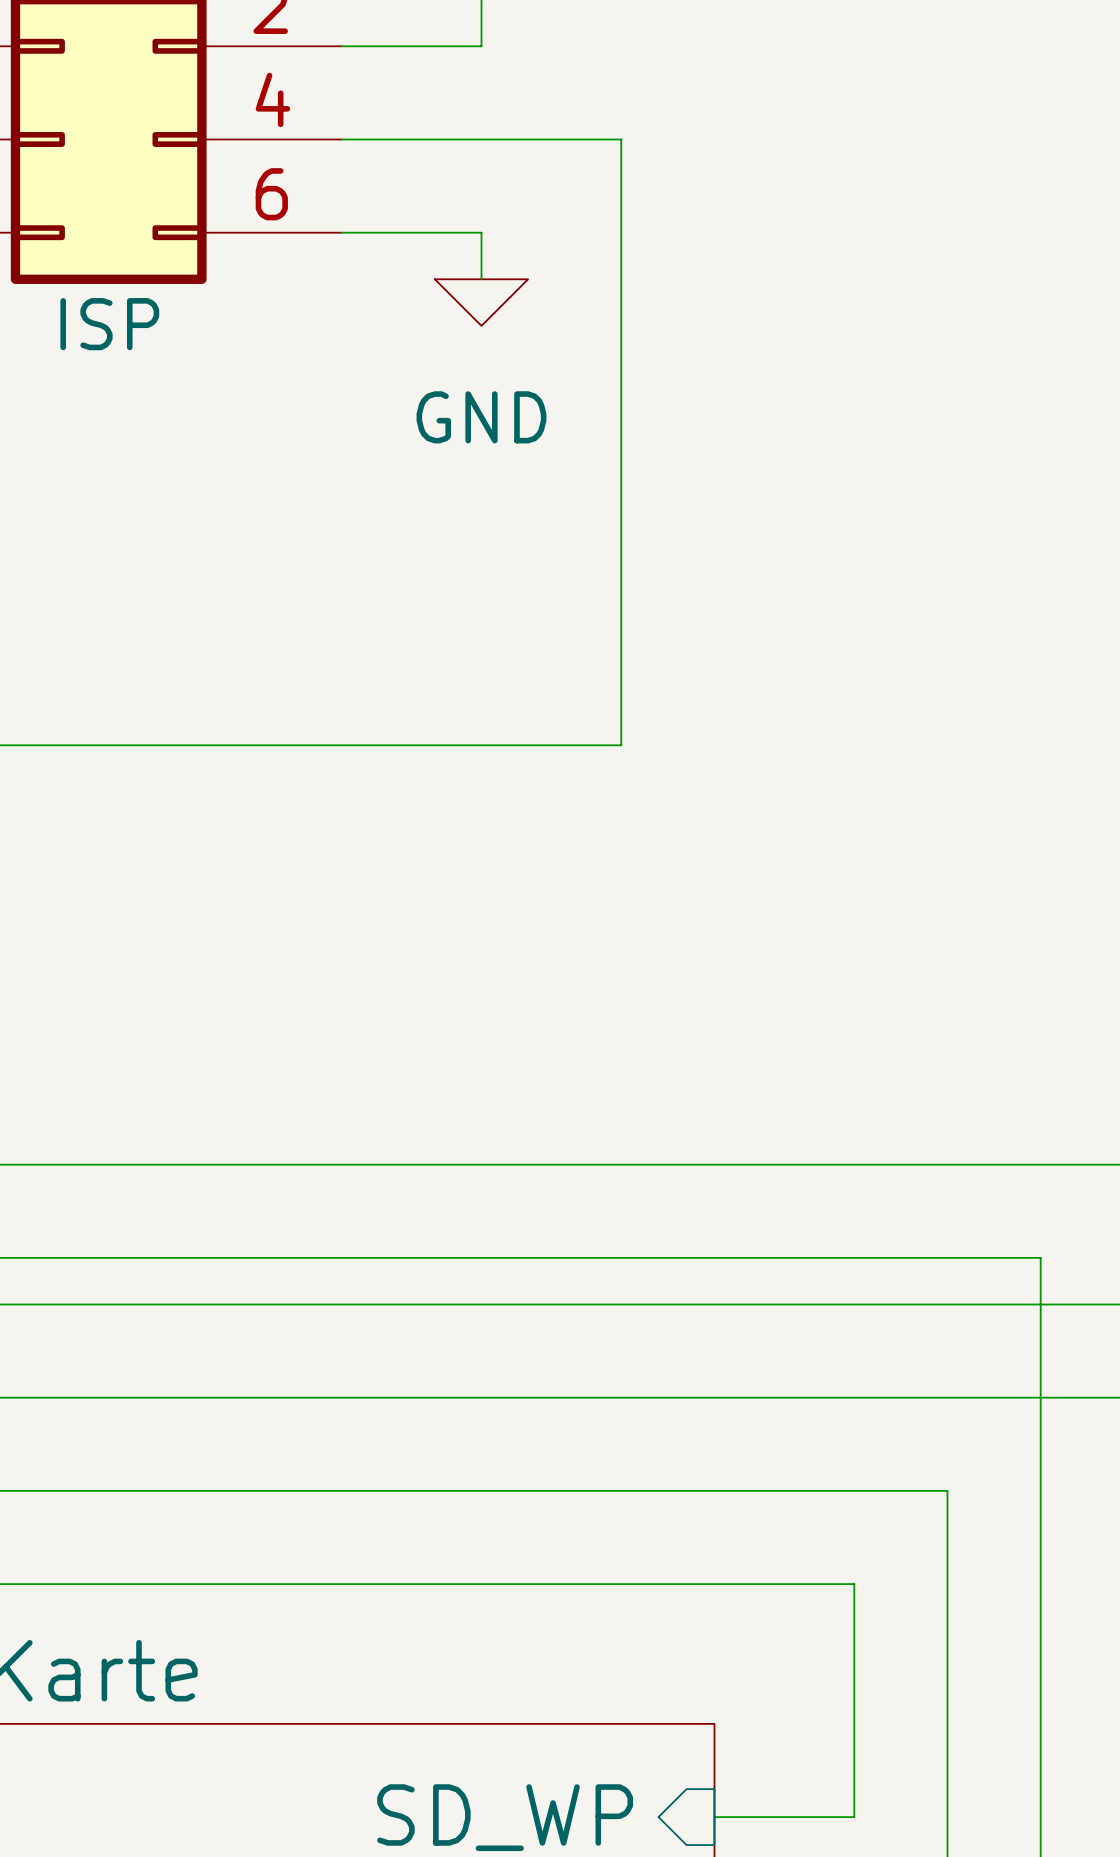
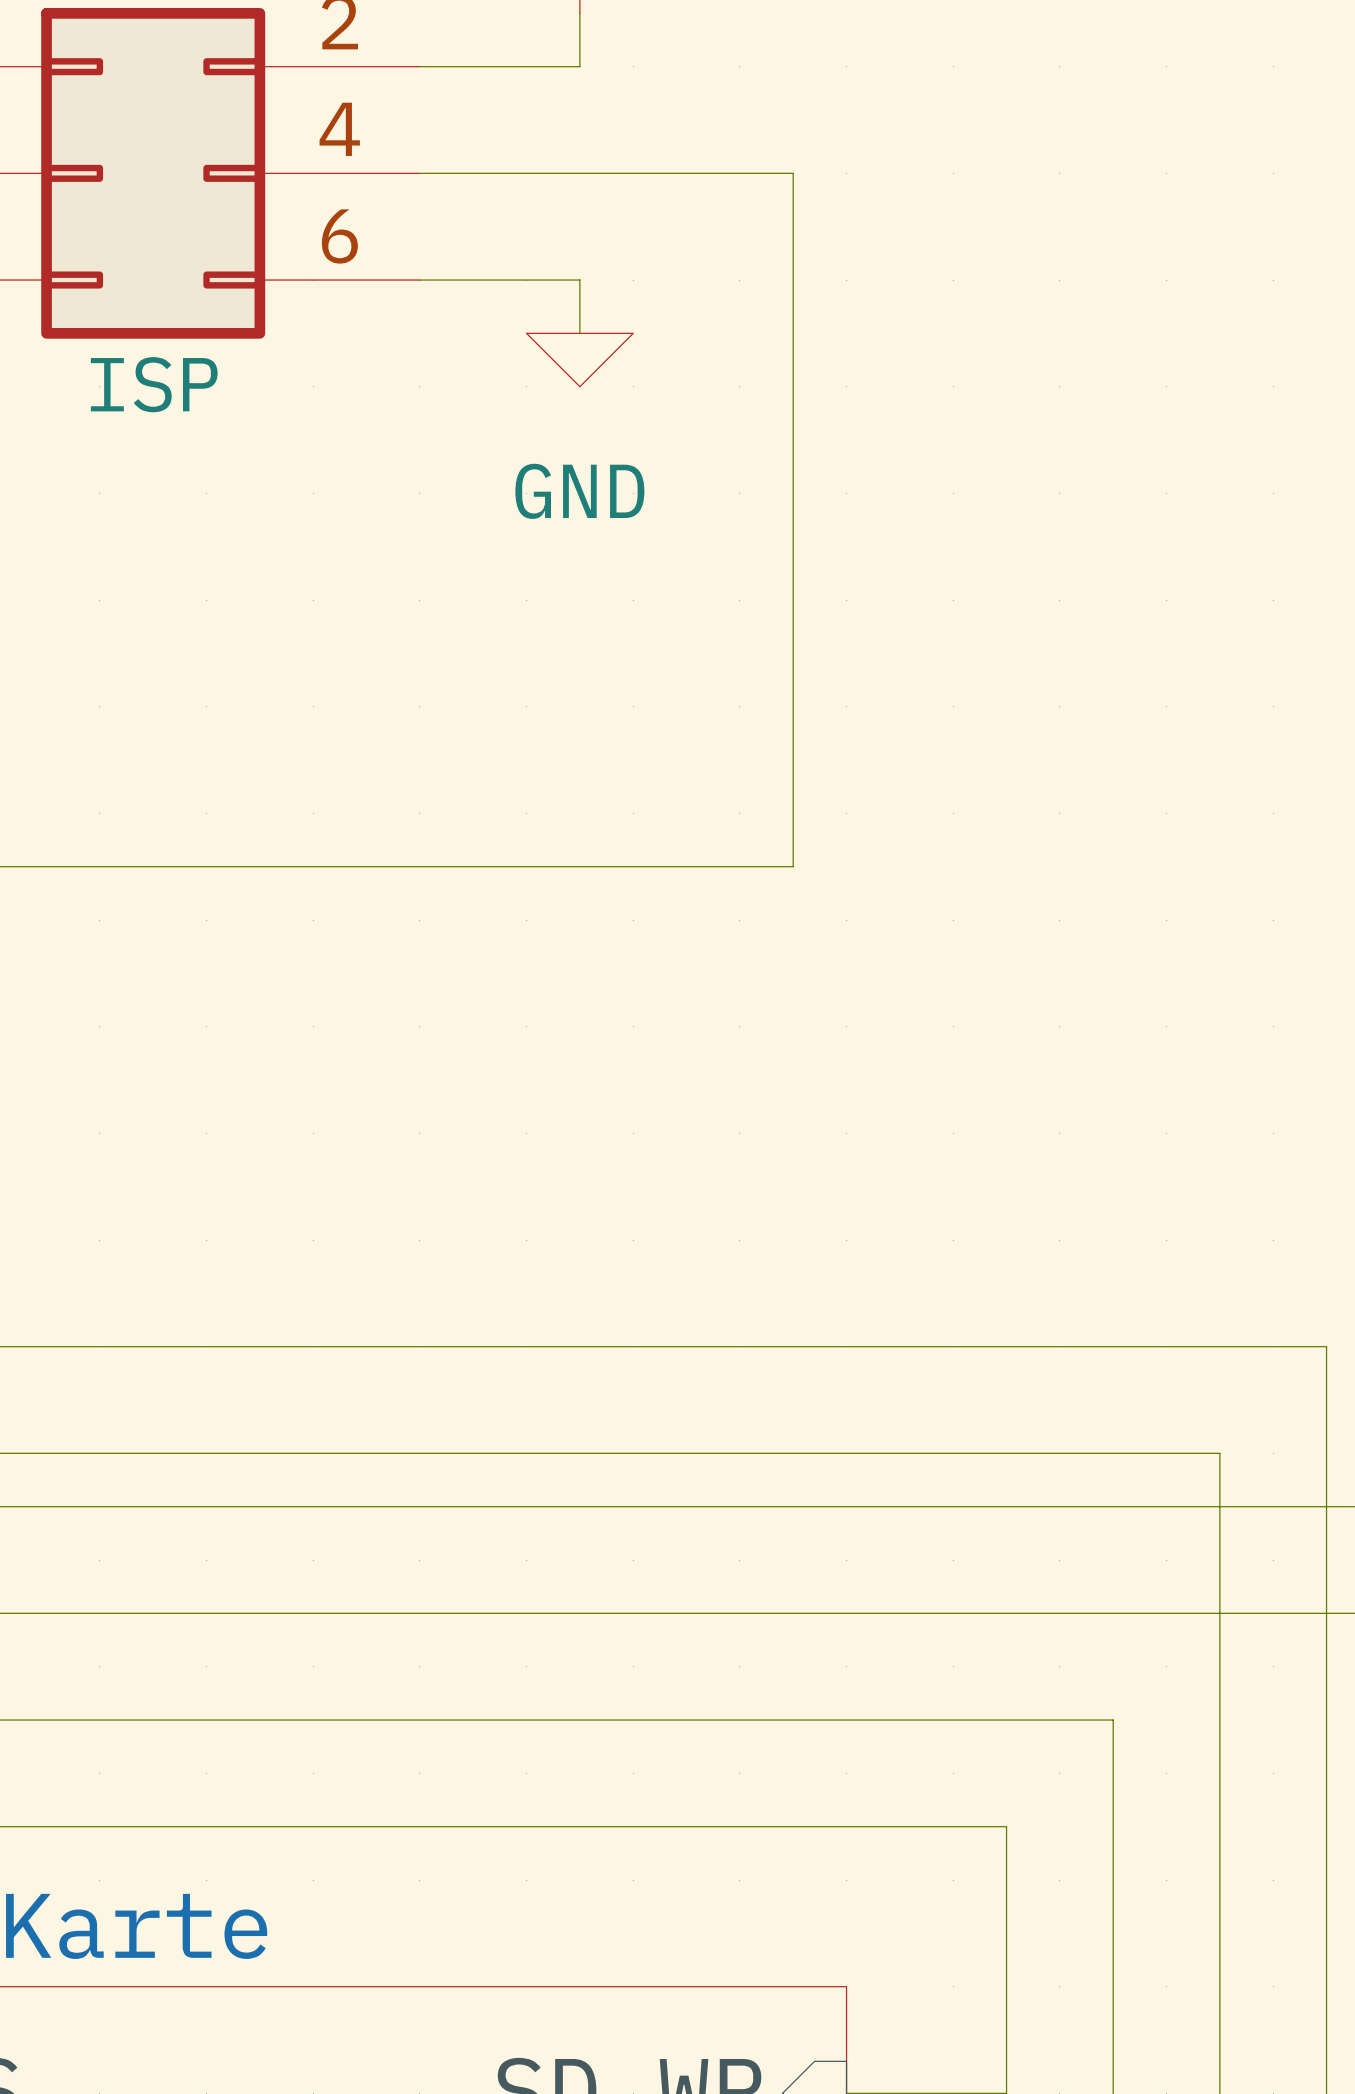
wire: (621, 139) (621, 745) -> (739, 173) (793, 173) (793, 866) (739, 866)

